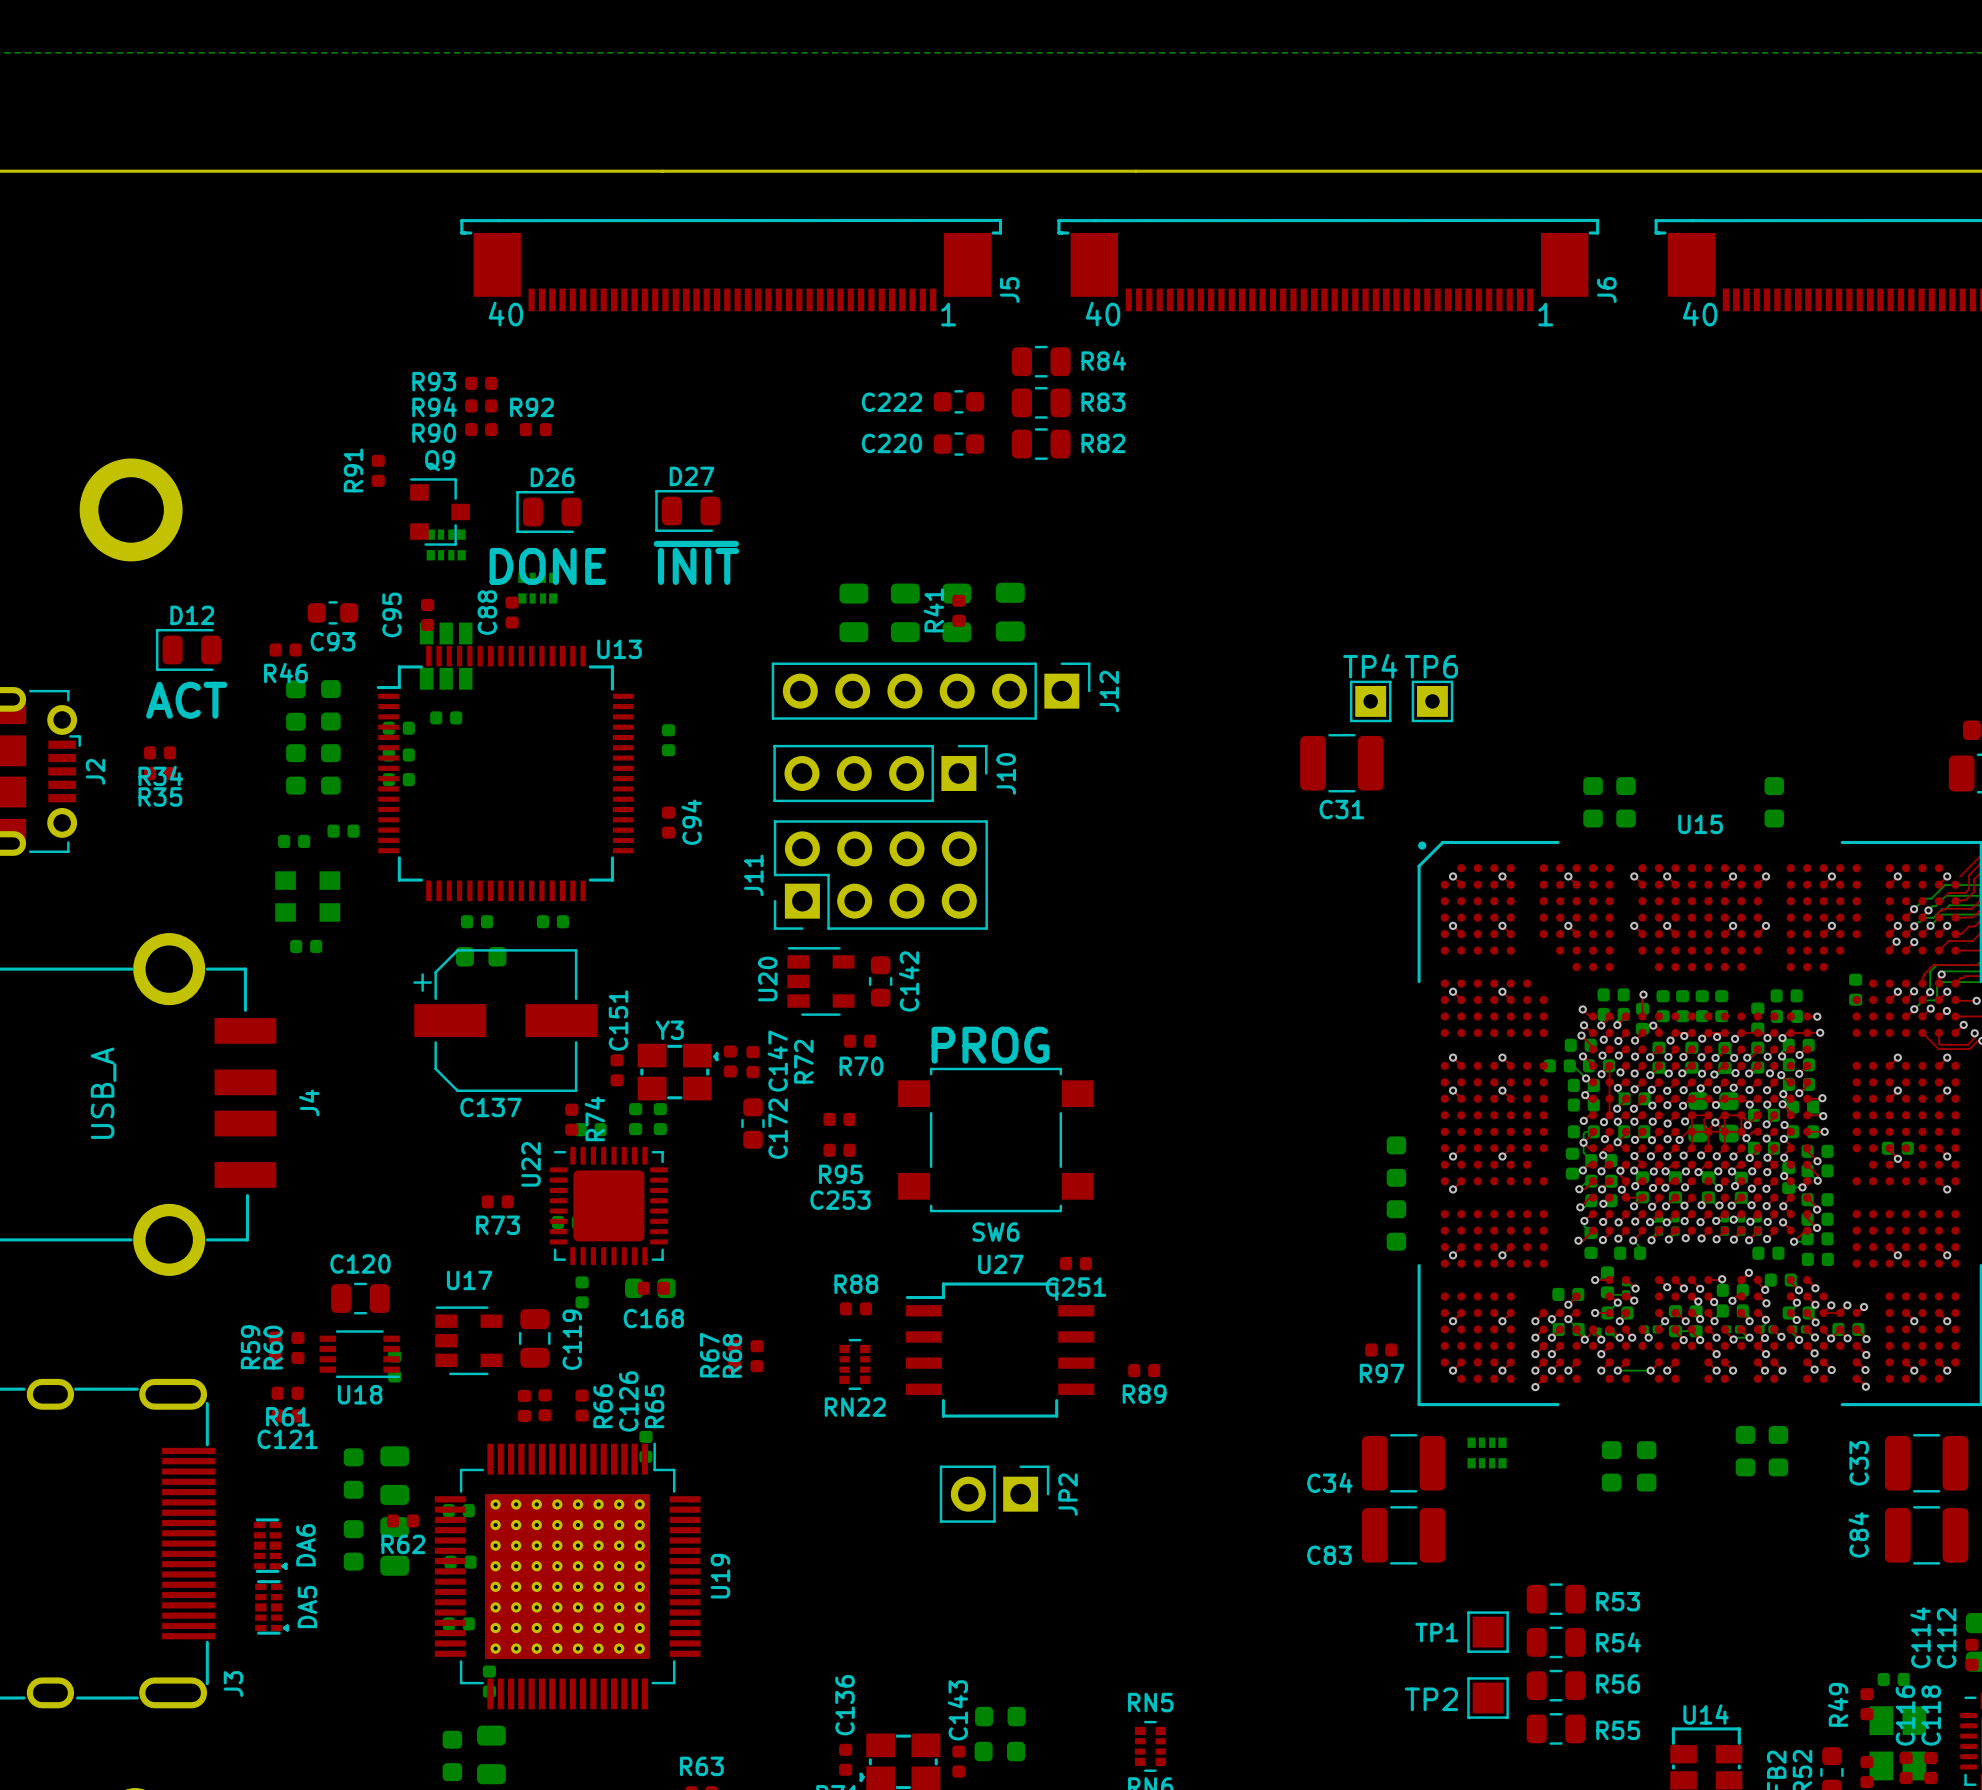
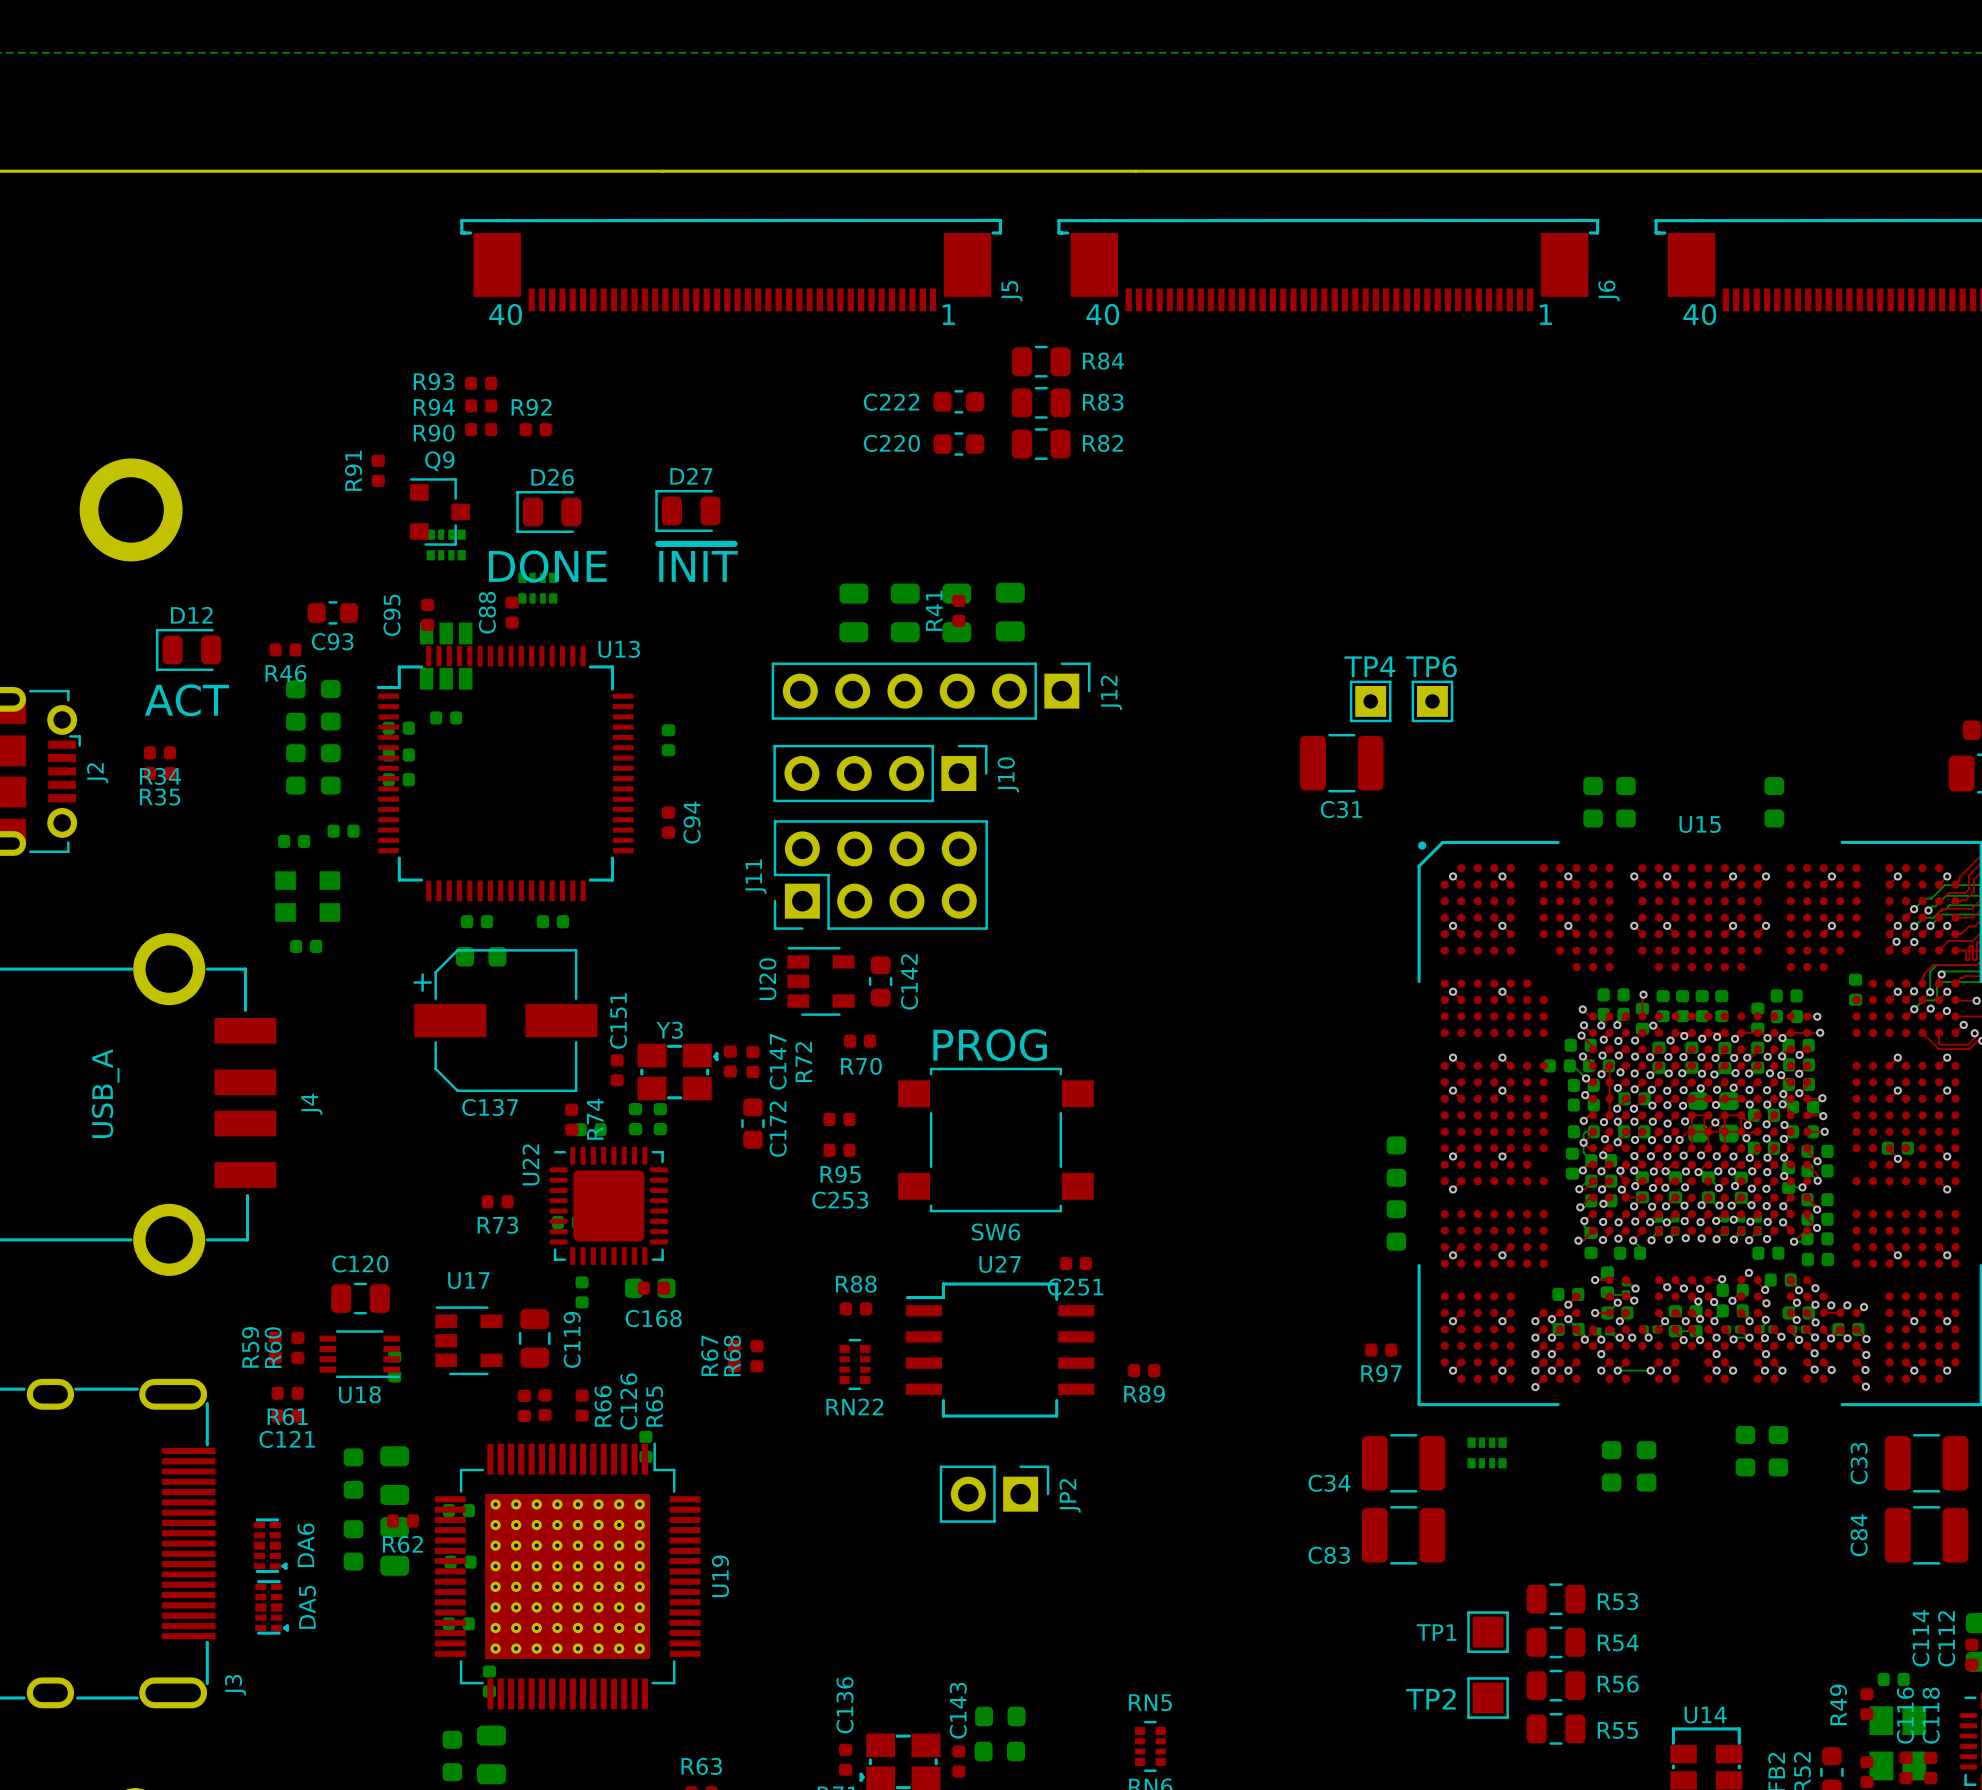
top track: none -> (1959, 876) (1959, 880) (1955, 884)
top track: none -> (1976, 943) (1976, 958)
top track: none -> (1980, 943) (1980, 958)
top track: none -> (1969, 947) (1969, 958)
top track: none -> (1973, 947) (1973, 958)
top track: none -> (1965, 952) (1965, 958)

